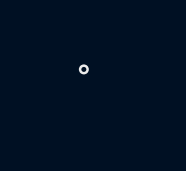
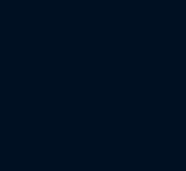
via: (83, 69) -> none

